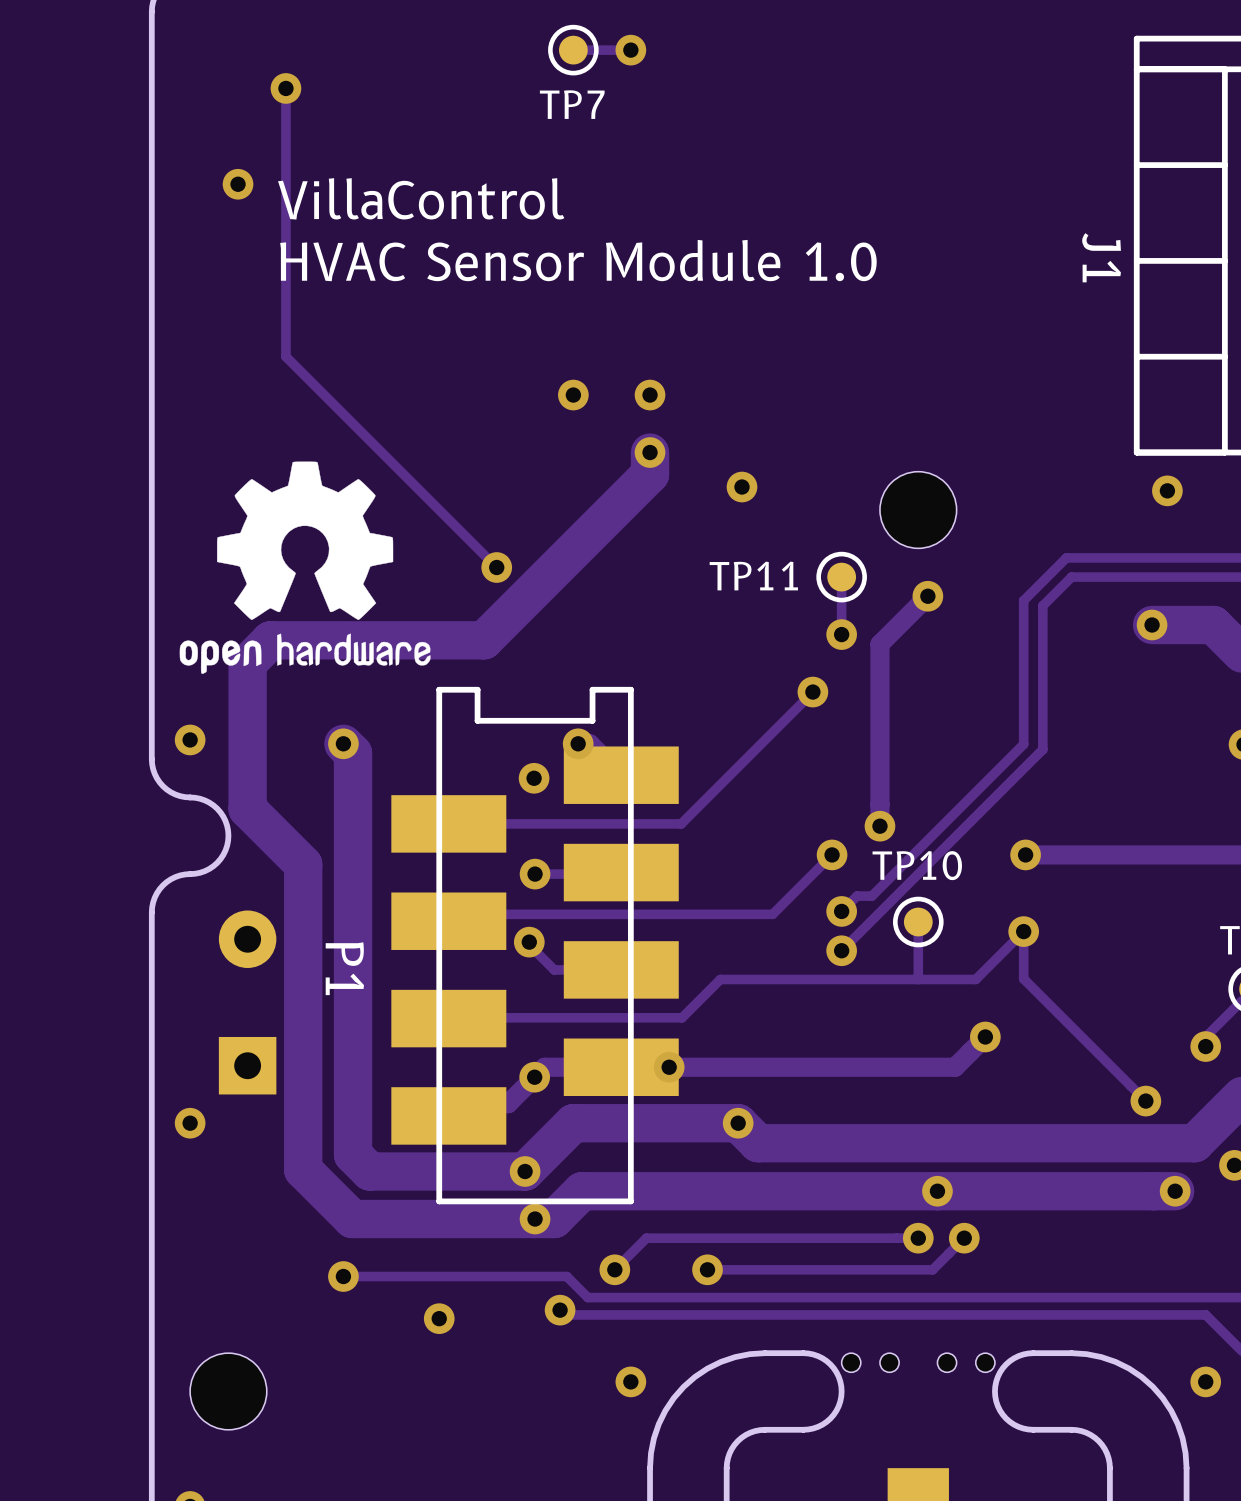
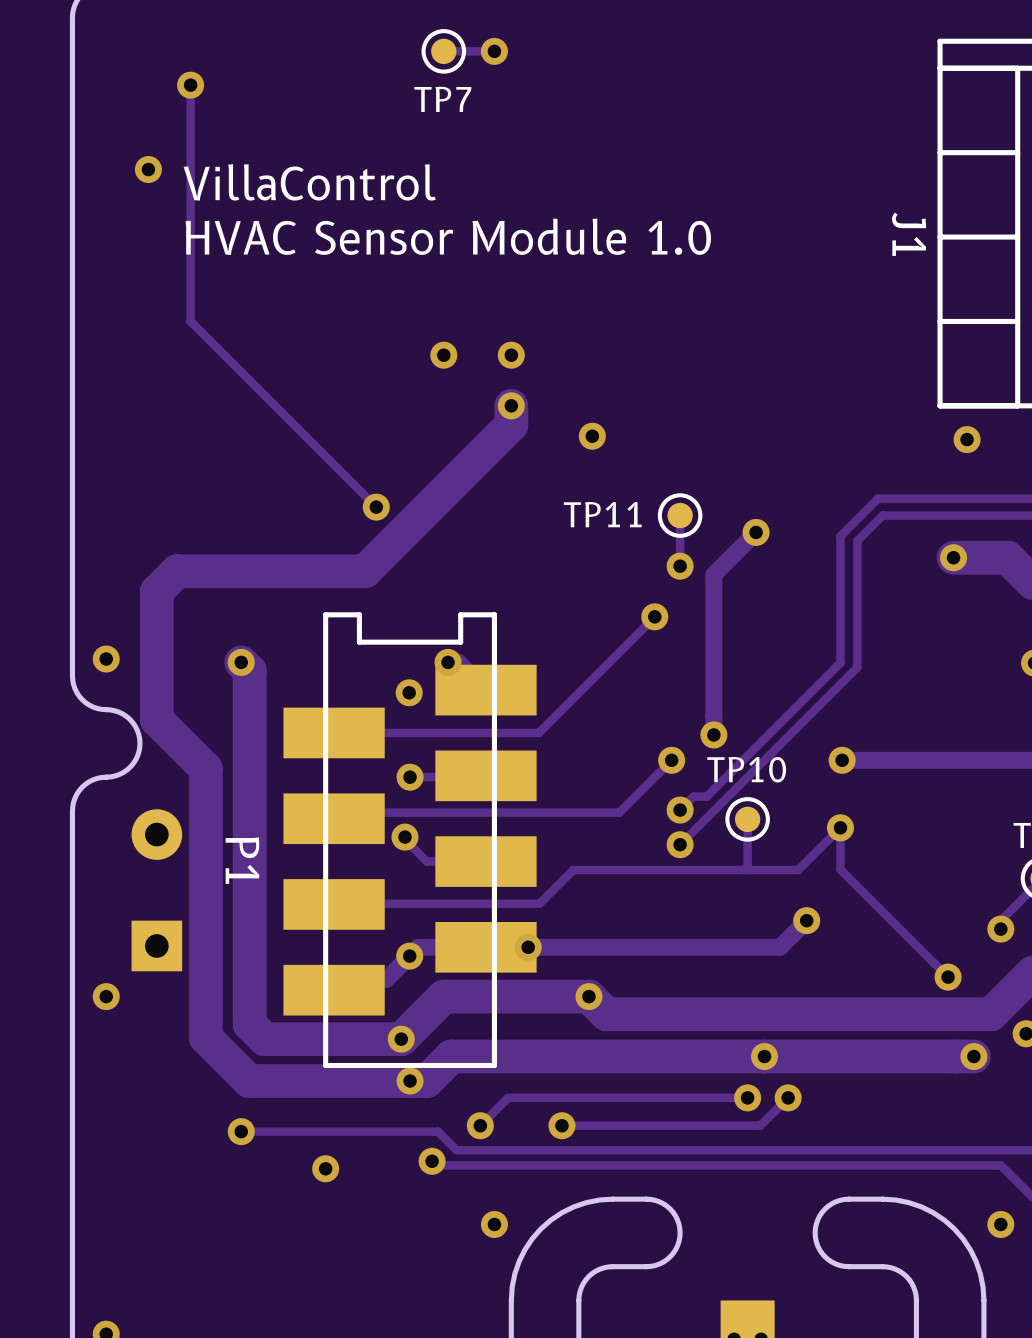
drawing: [179, 461, 431, 674] -> none
part: (918, 510) -> none
part: (918, 1362) -> none
part: (228, 1391) -> none

